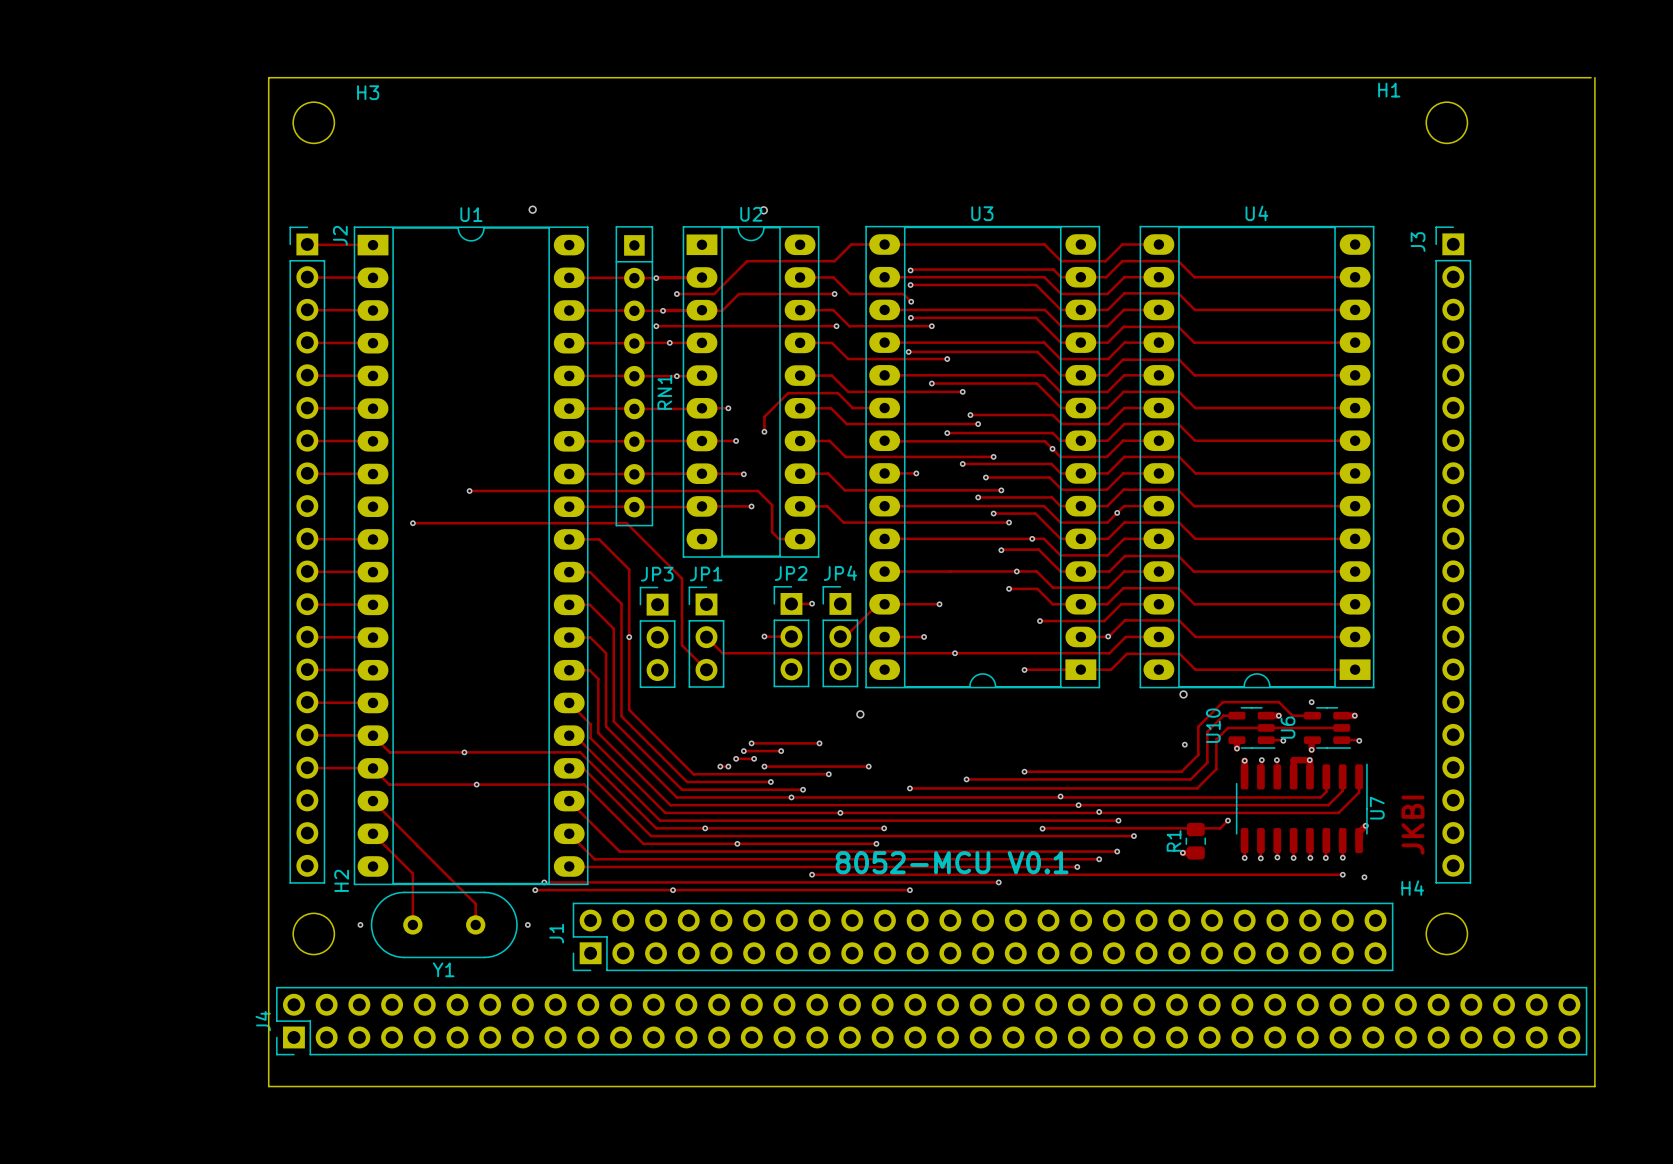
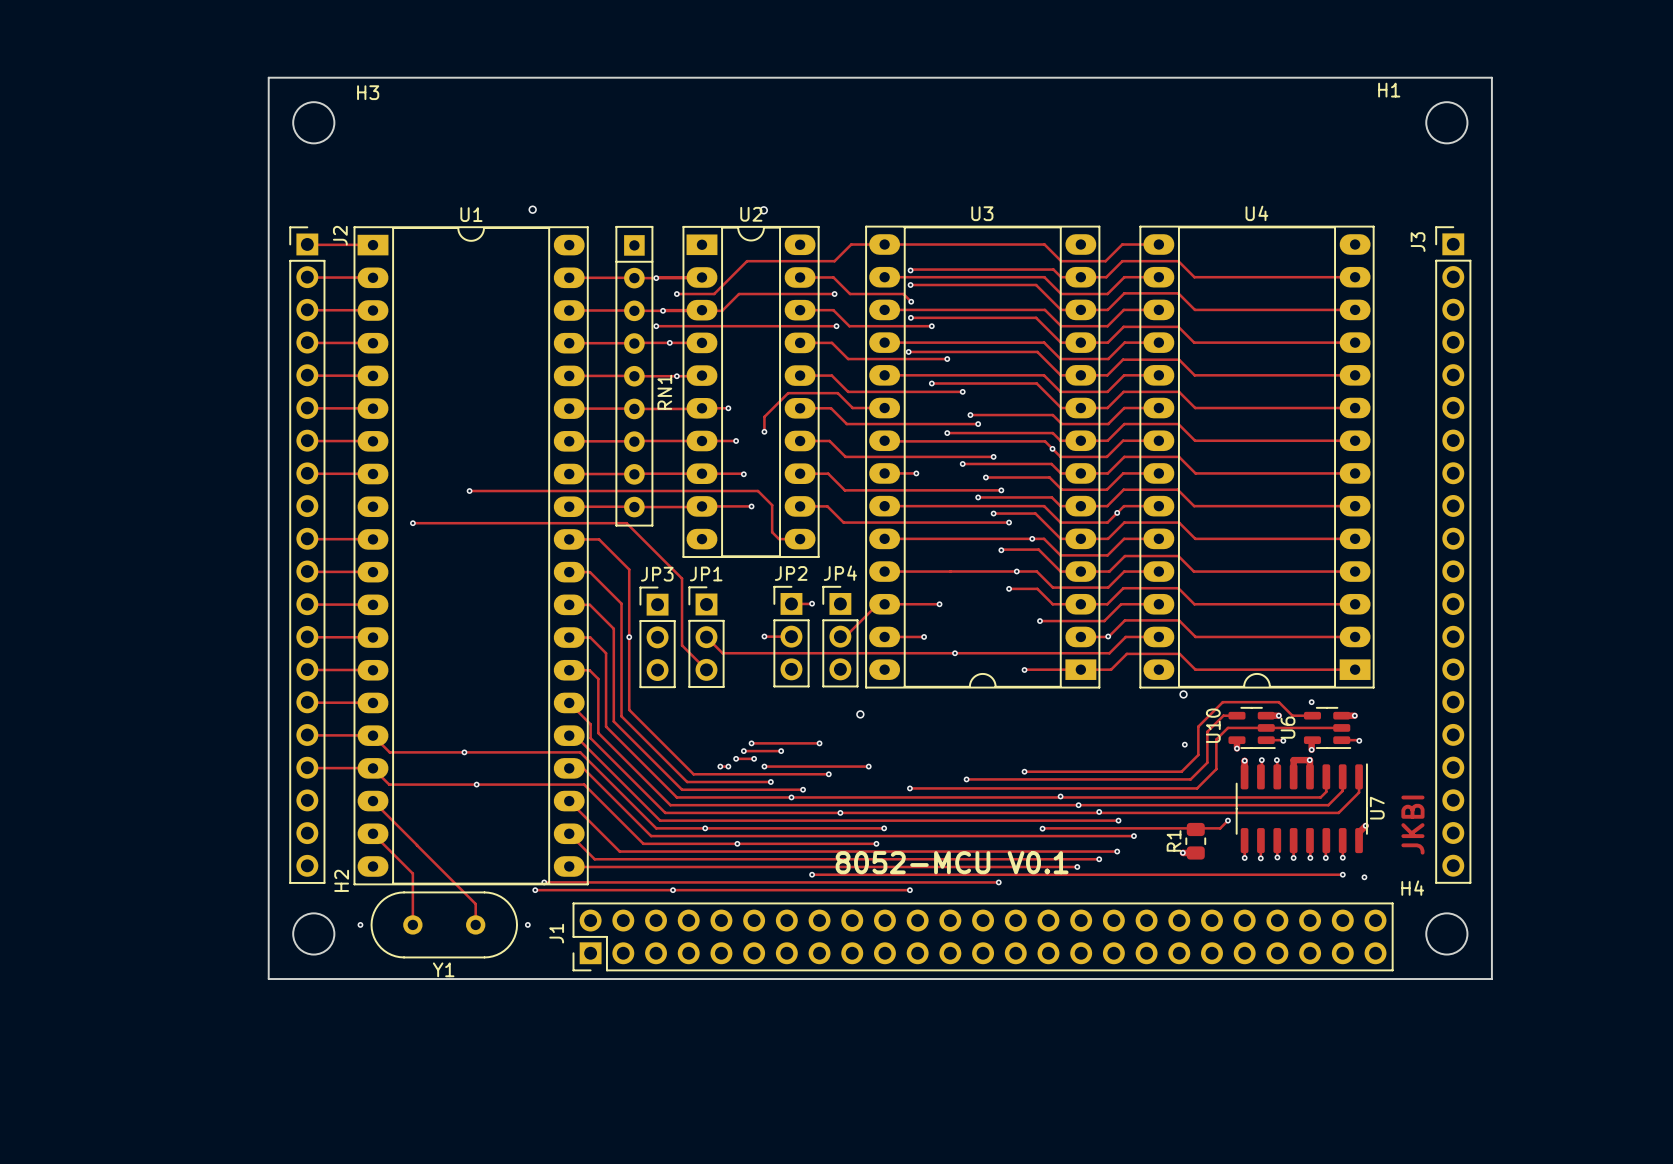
board edge: (1491, 77) (1591, 77) -> none
board edge: (1594, 77) (1594, 1086) (268, 1086) (268, 979) -> (1491, 77) (1491, 979) (268, 979)
J4: (931, 1021) -> none

